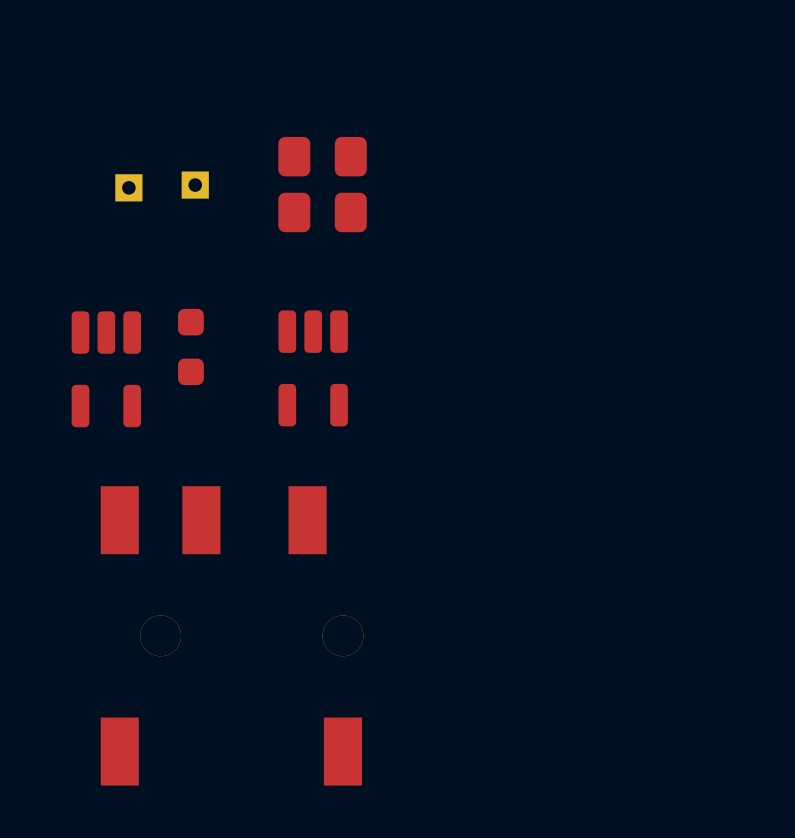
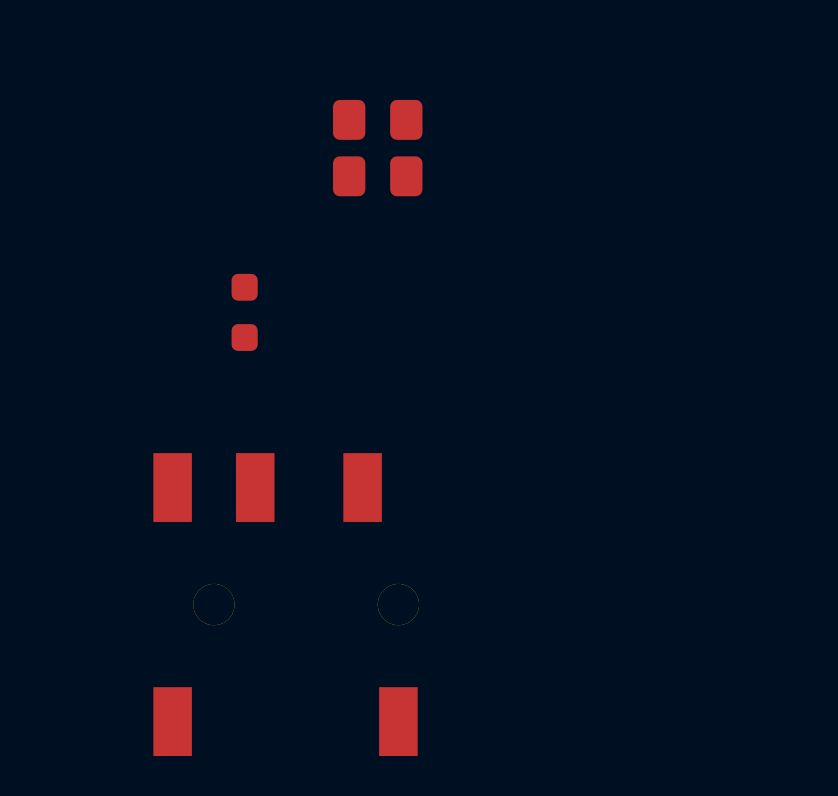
part: (195, 185) -> none
part: (128, 187) -> none
part: (313, 368) -> none
part: (106, 369) -> none

